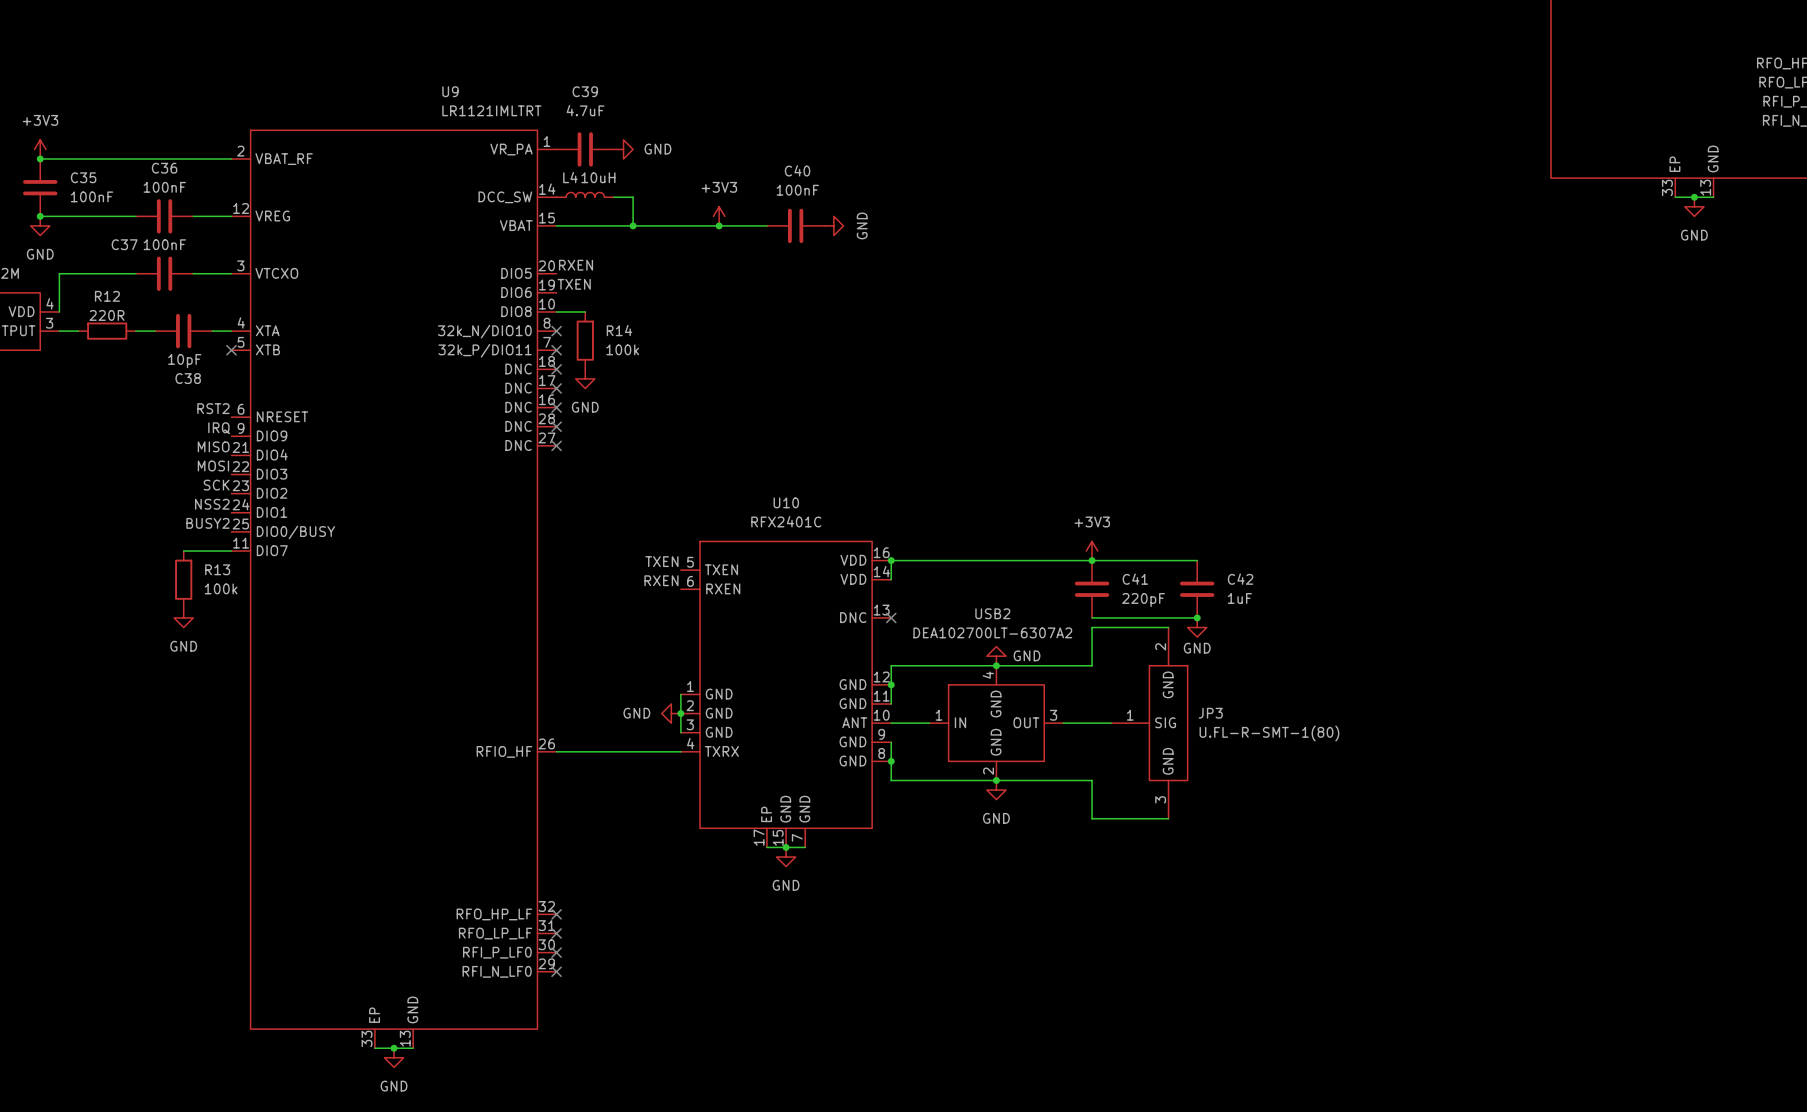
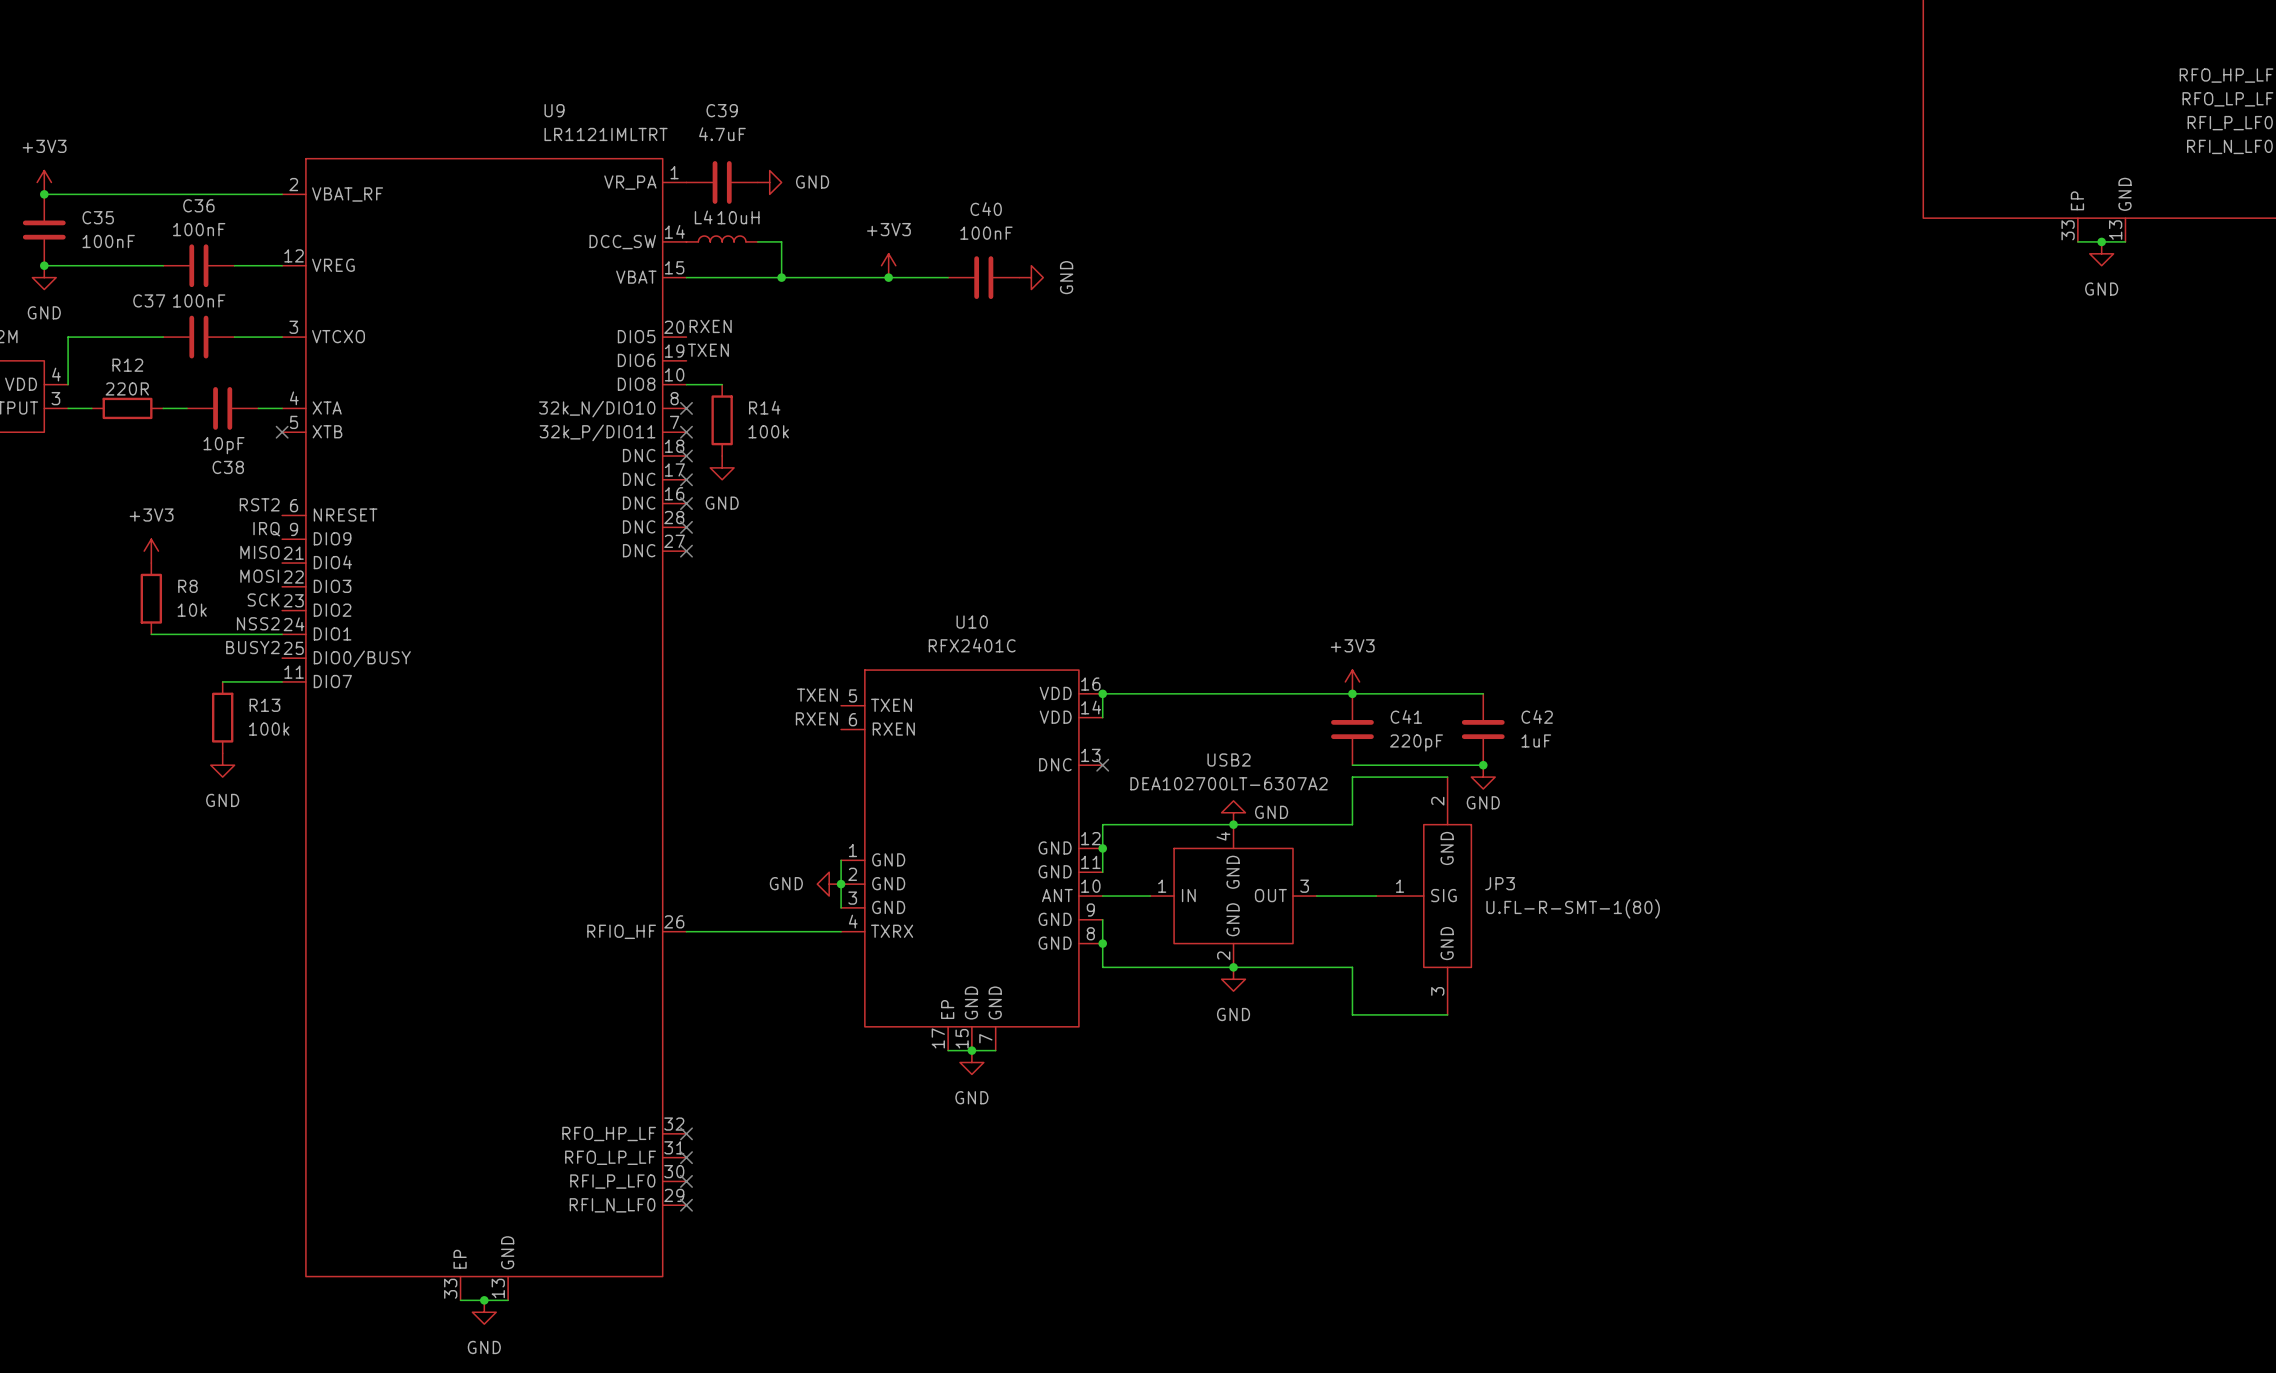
power symbol: none -> +3V3 (151, 551)
R8: none -> 10k (151, 598)
wire: none -> (151, 634) (282, 634)

